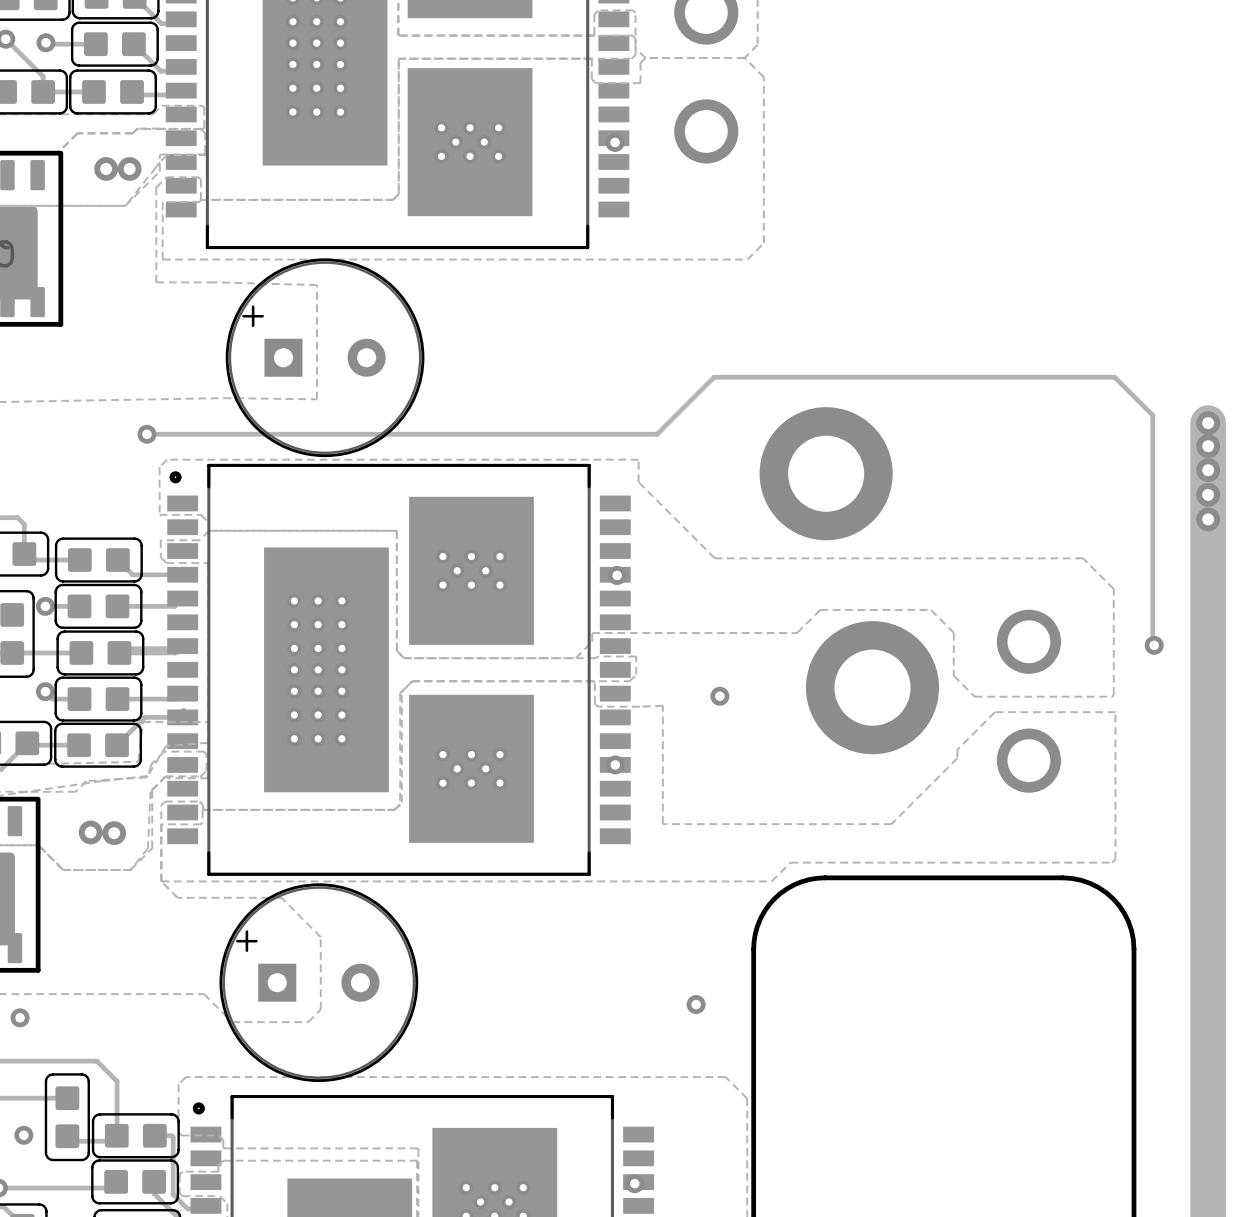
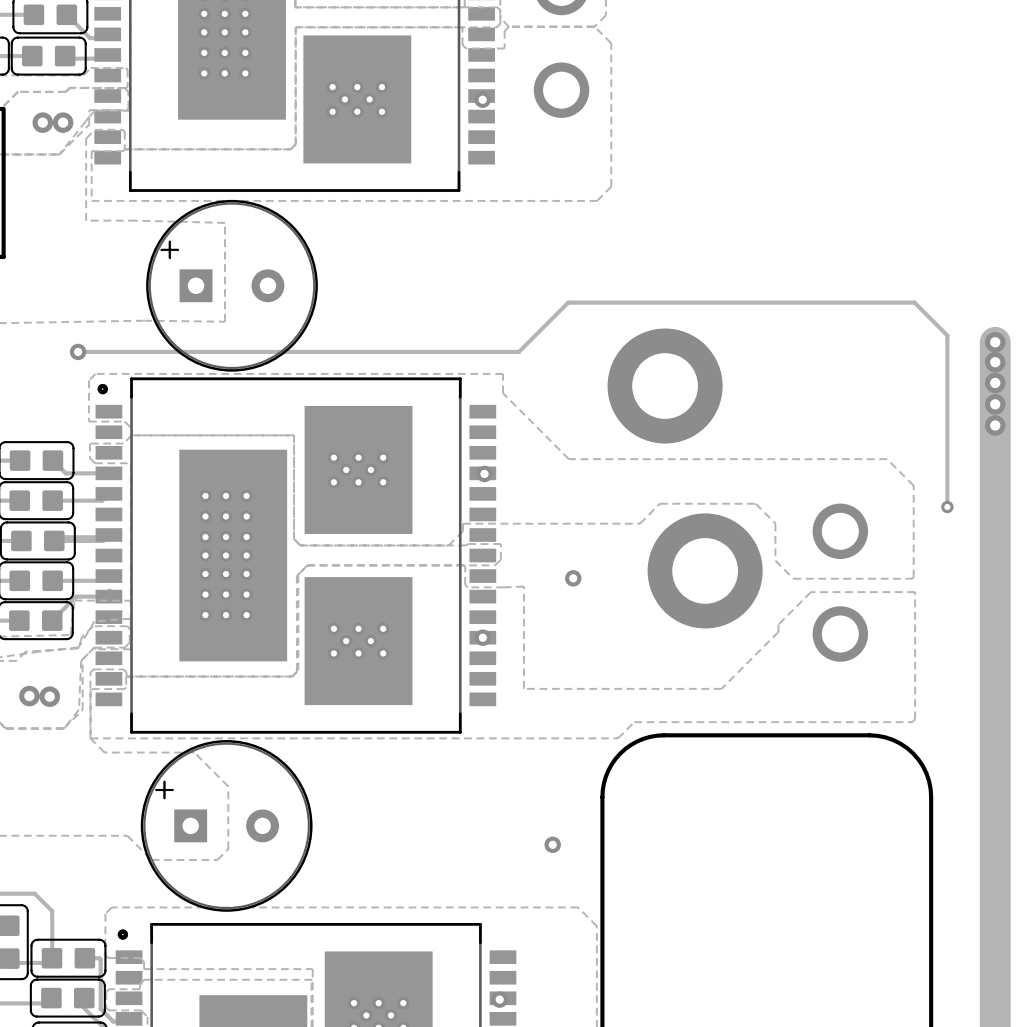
track: (1152, 613) (1154, 645) -> none
via: none -> (947, 507)
via: (1154, 645) -> none

